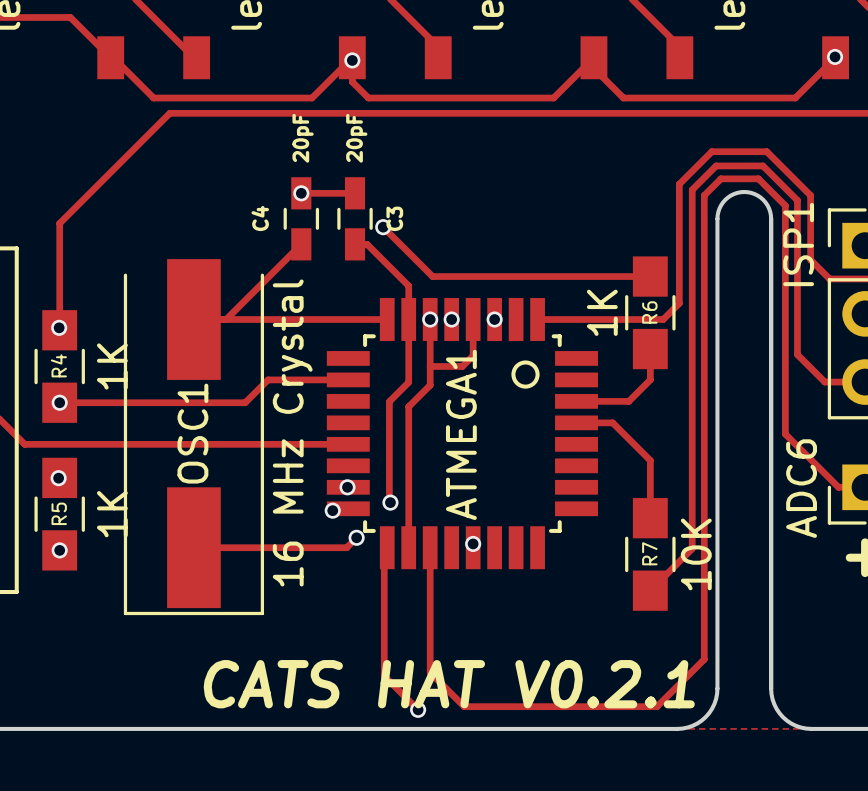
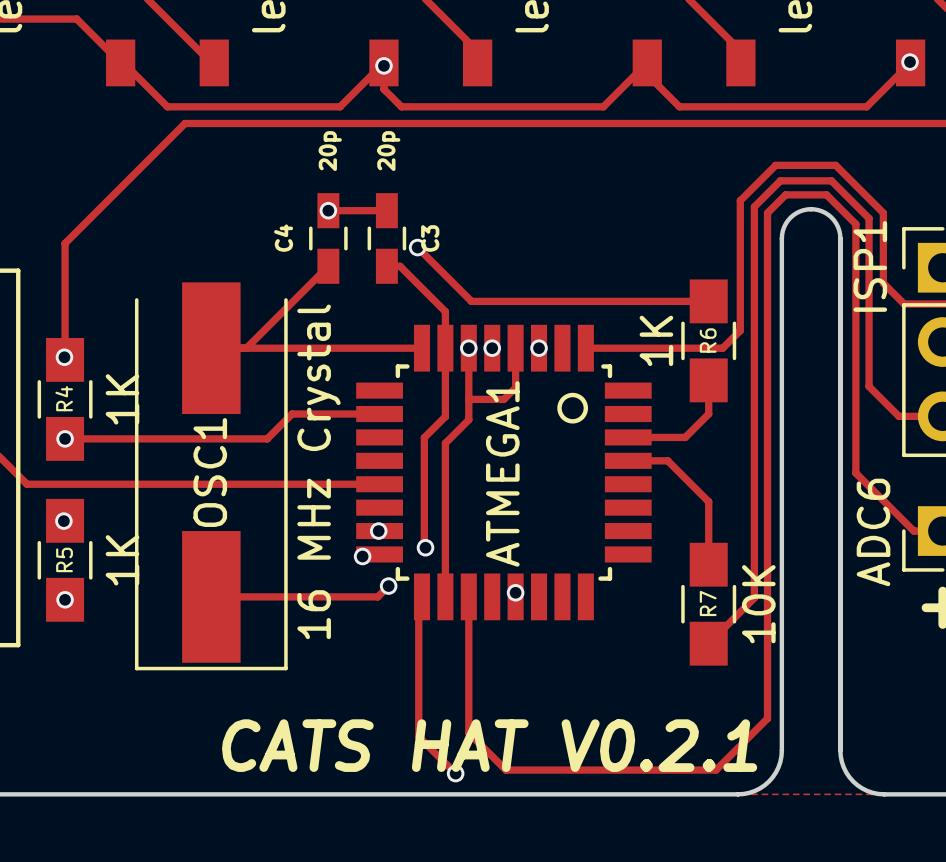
C4 value: 20pF (303, 138) -> 20p (330, 151)
C3 value: 20pF (356, 138) -> 20p (388, 151)

